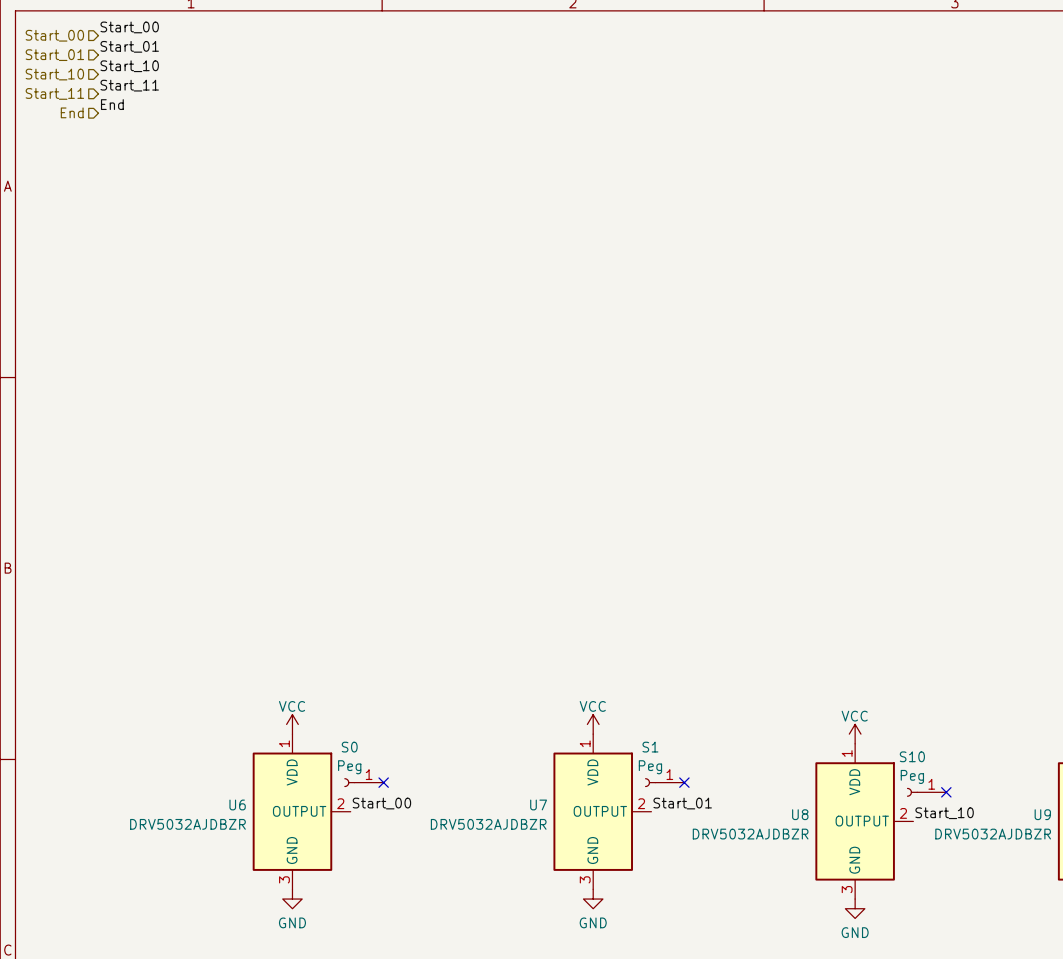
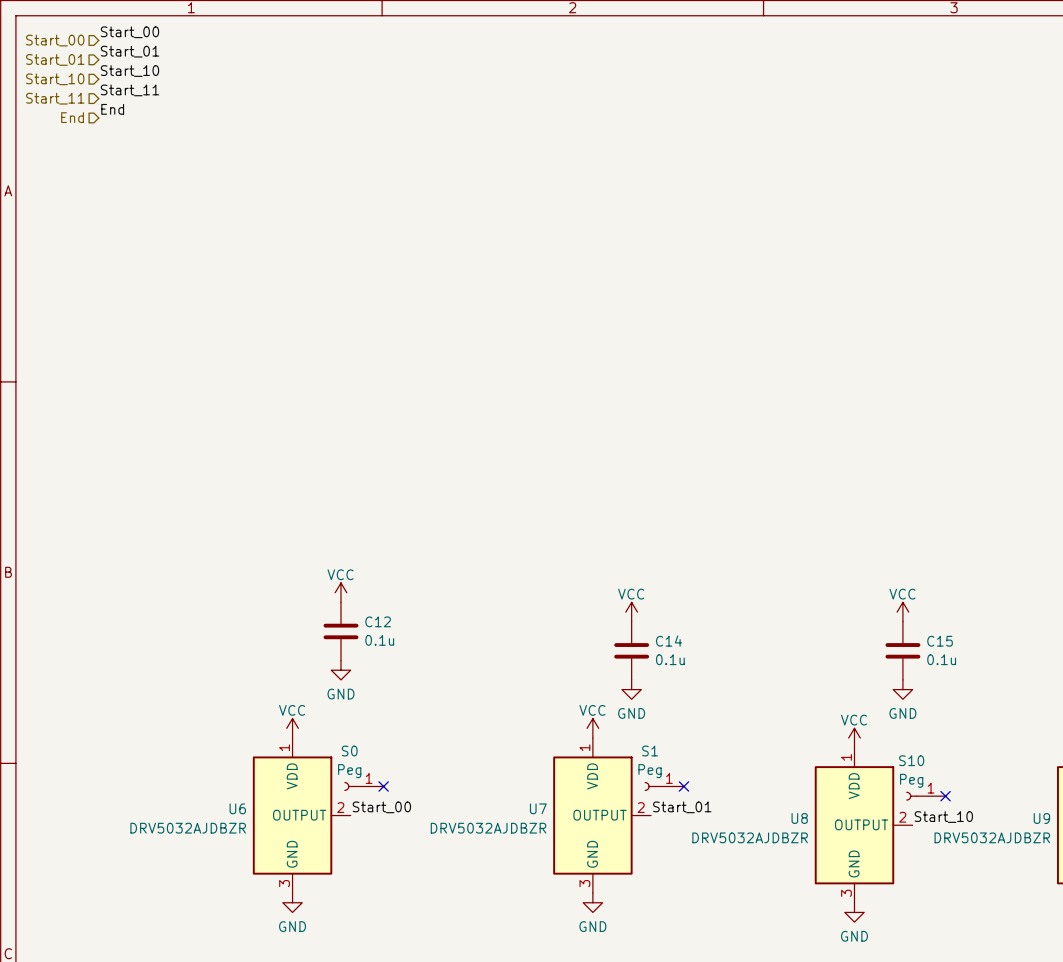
power symbol: none -> VCC (340, 592)
power symbol: none -> VCC (631, 612)
power symbol: none -> VCC (902, 612)
C12: none -> 0.1u (340, 631)
C14: none -> 0.1u (631, 650)
C15: none -> 0.1u (902, 650)
power symbol: none -> GND (340, 670)
power symbol: none -> GND (631, 689)
power symbol: none -> GND (902, 689)

